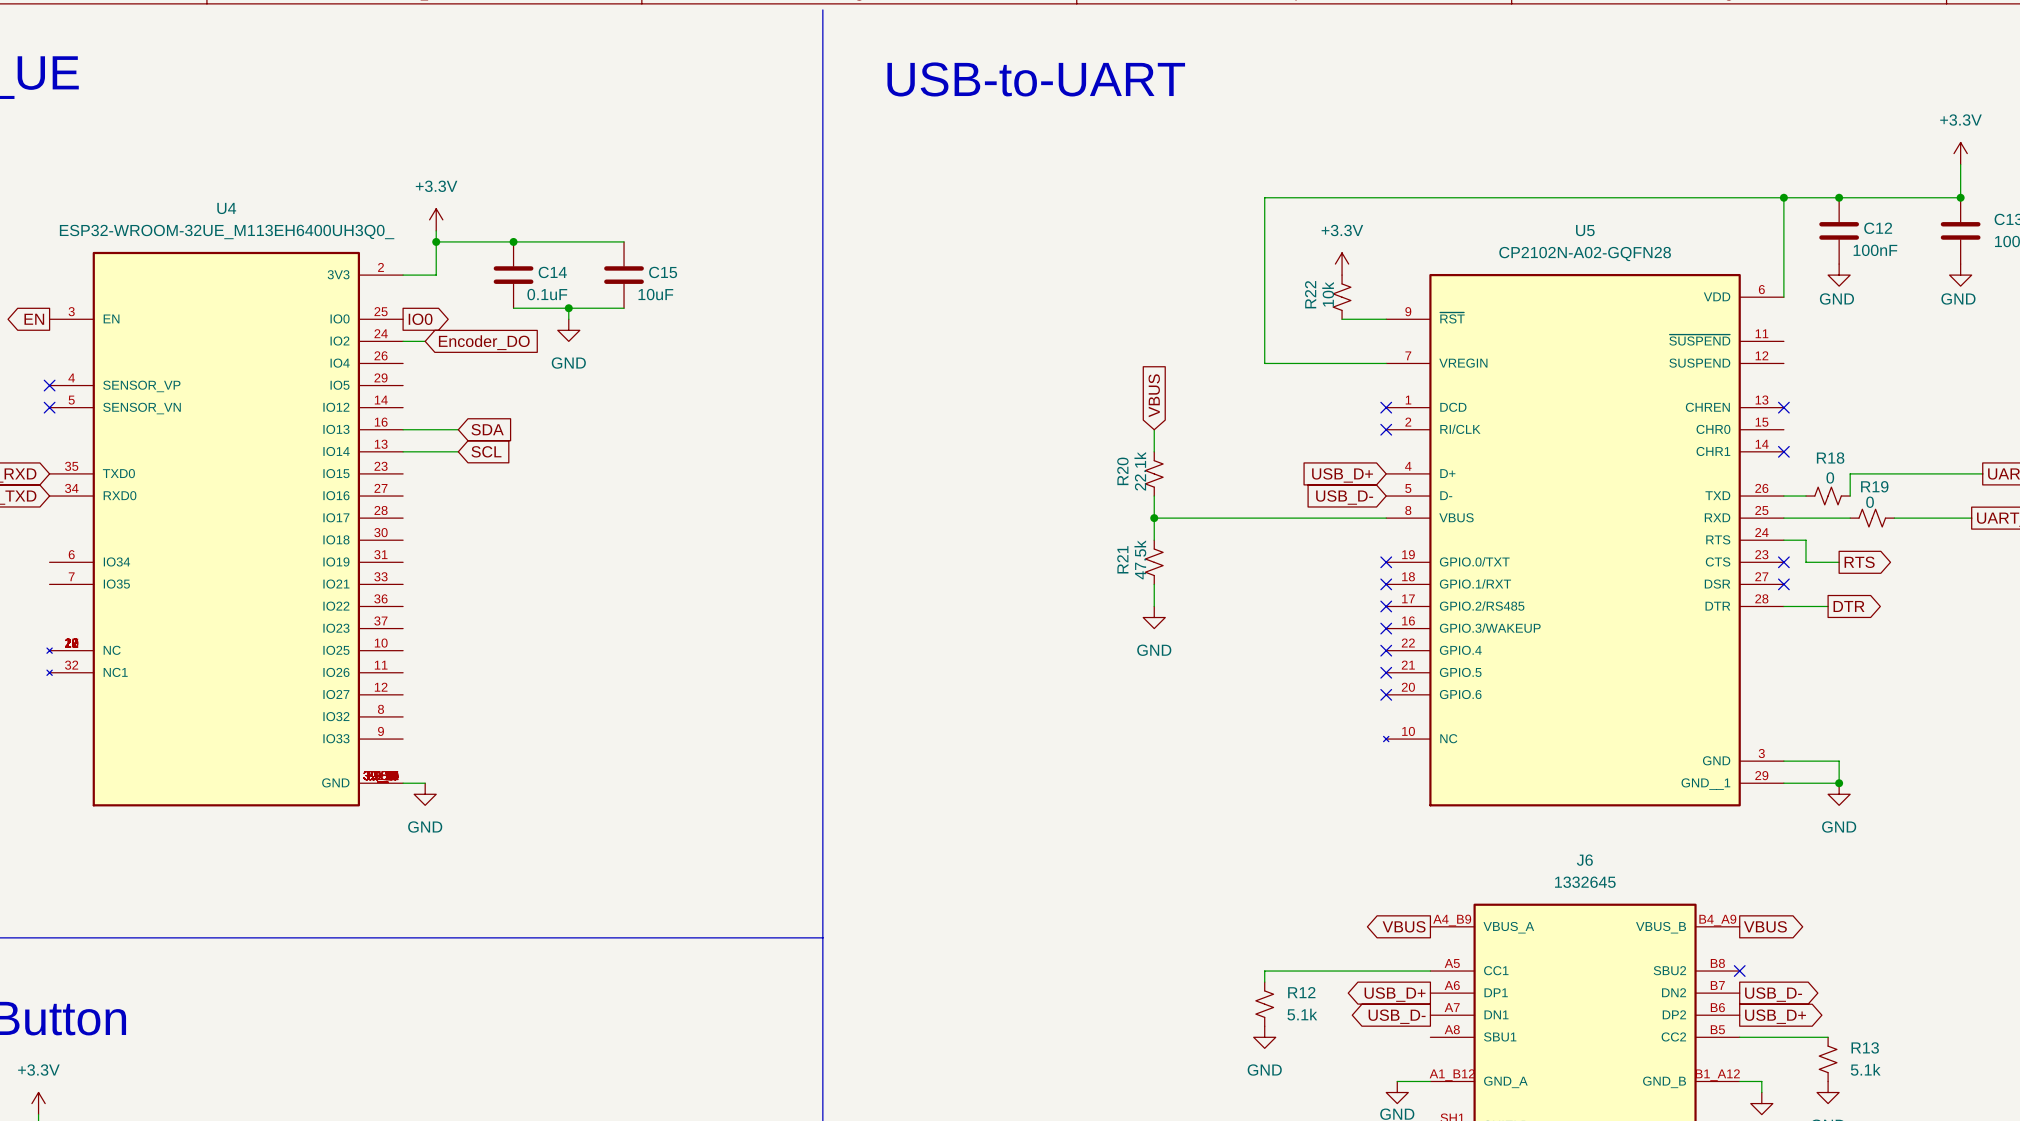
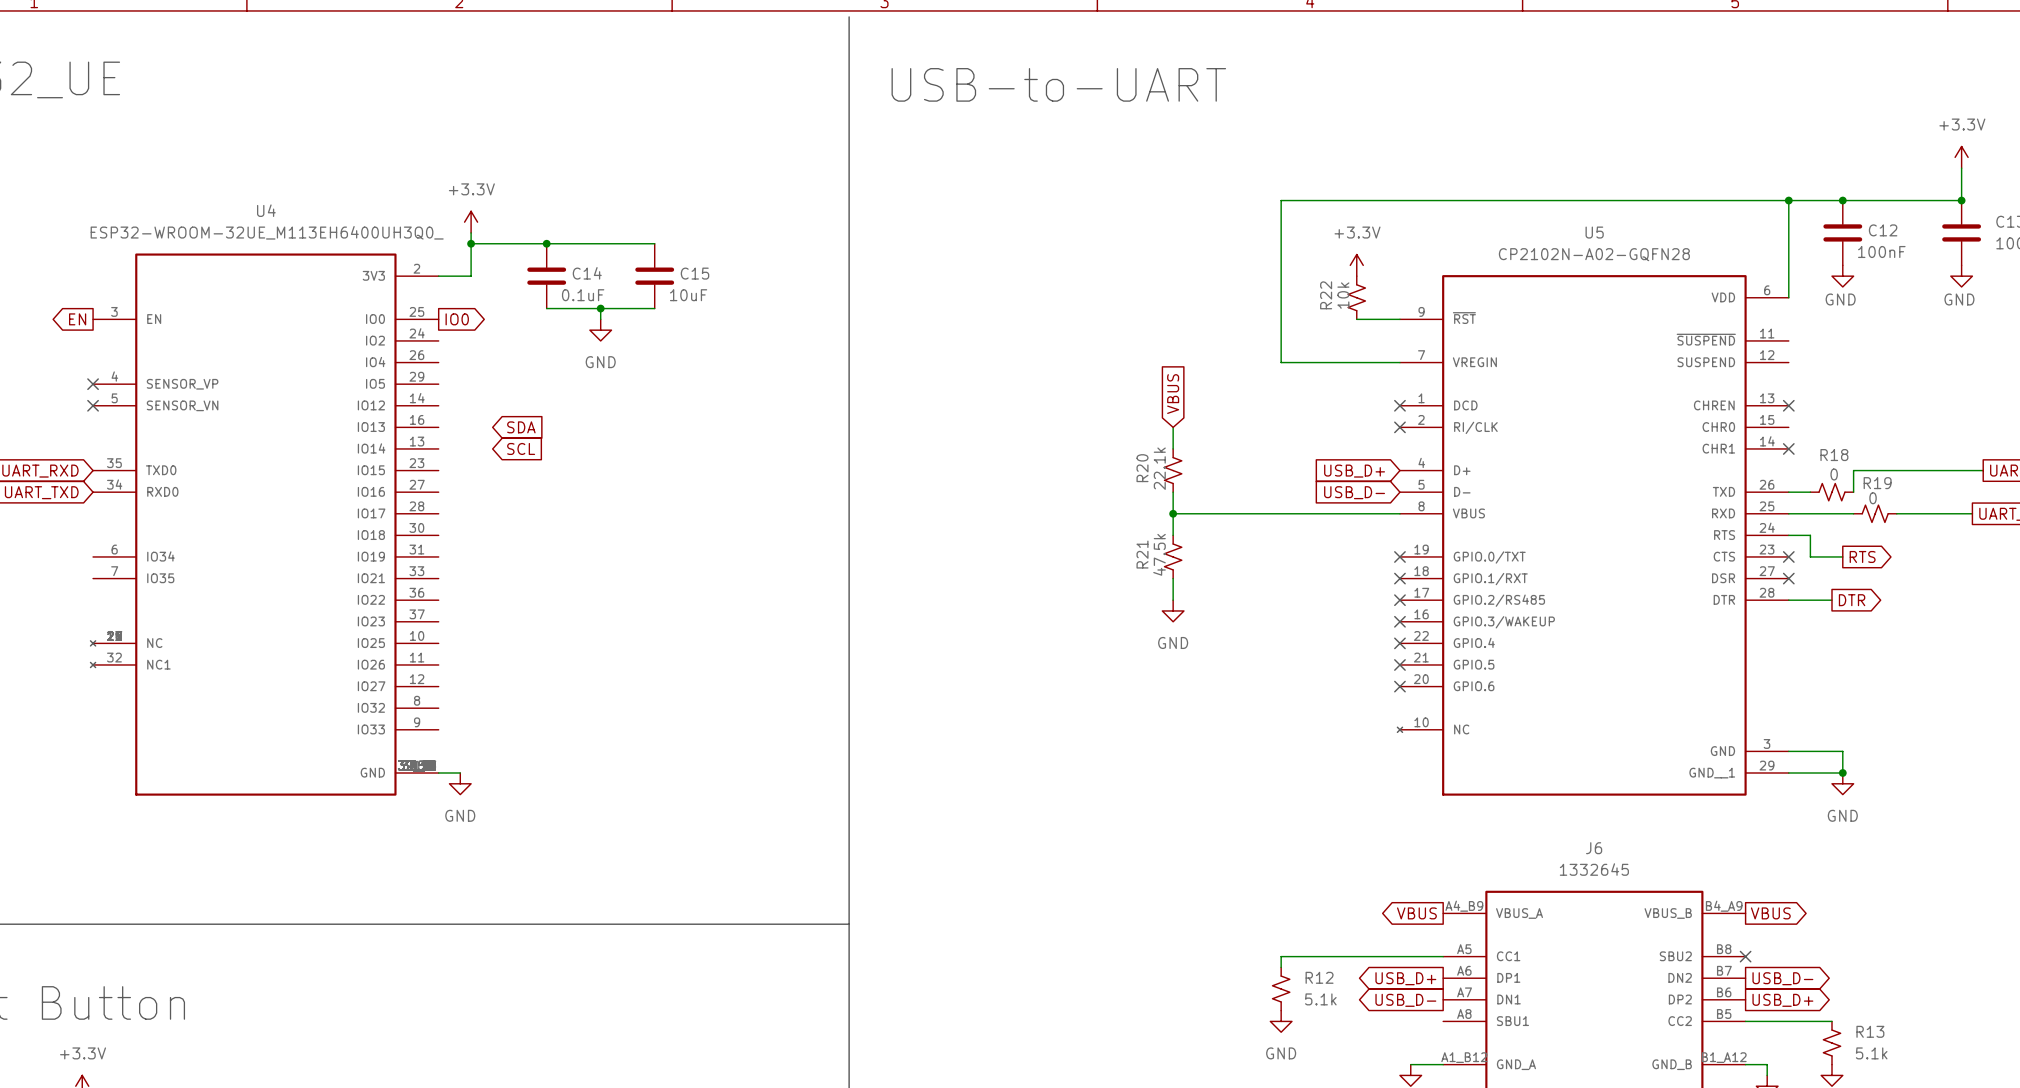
wire: (403, 341) (425, 341) -> none
global label: Encoder_DO (484, 342) -> none
wire: (403, 429) (458, 429) -> none
wire: (403, 451) (458, 451) -> none

